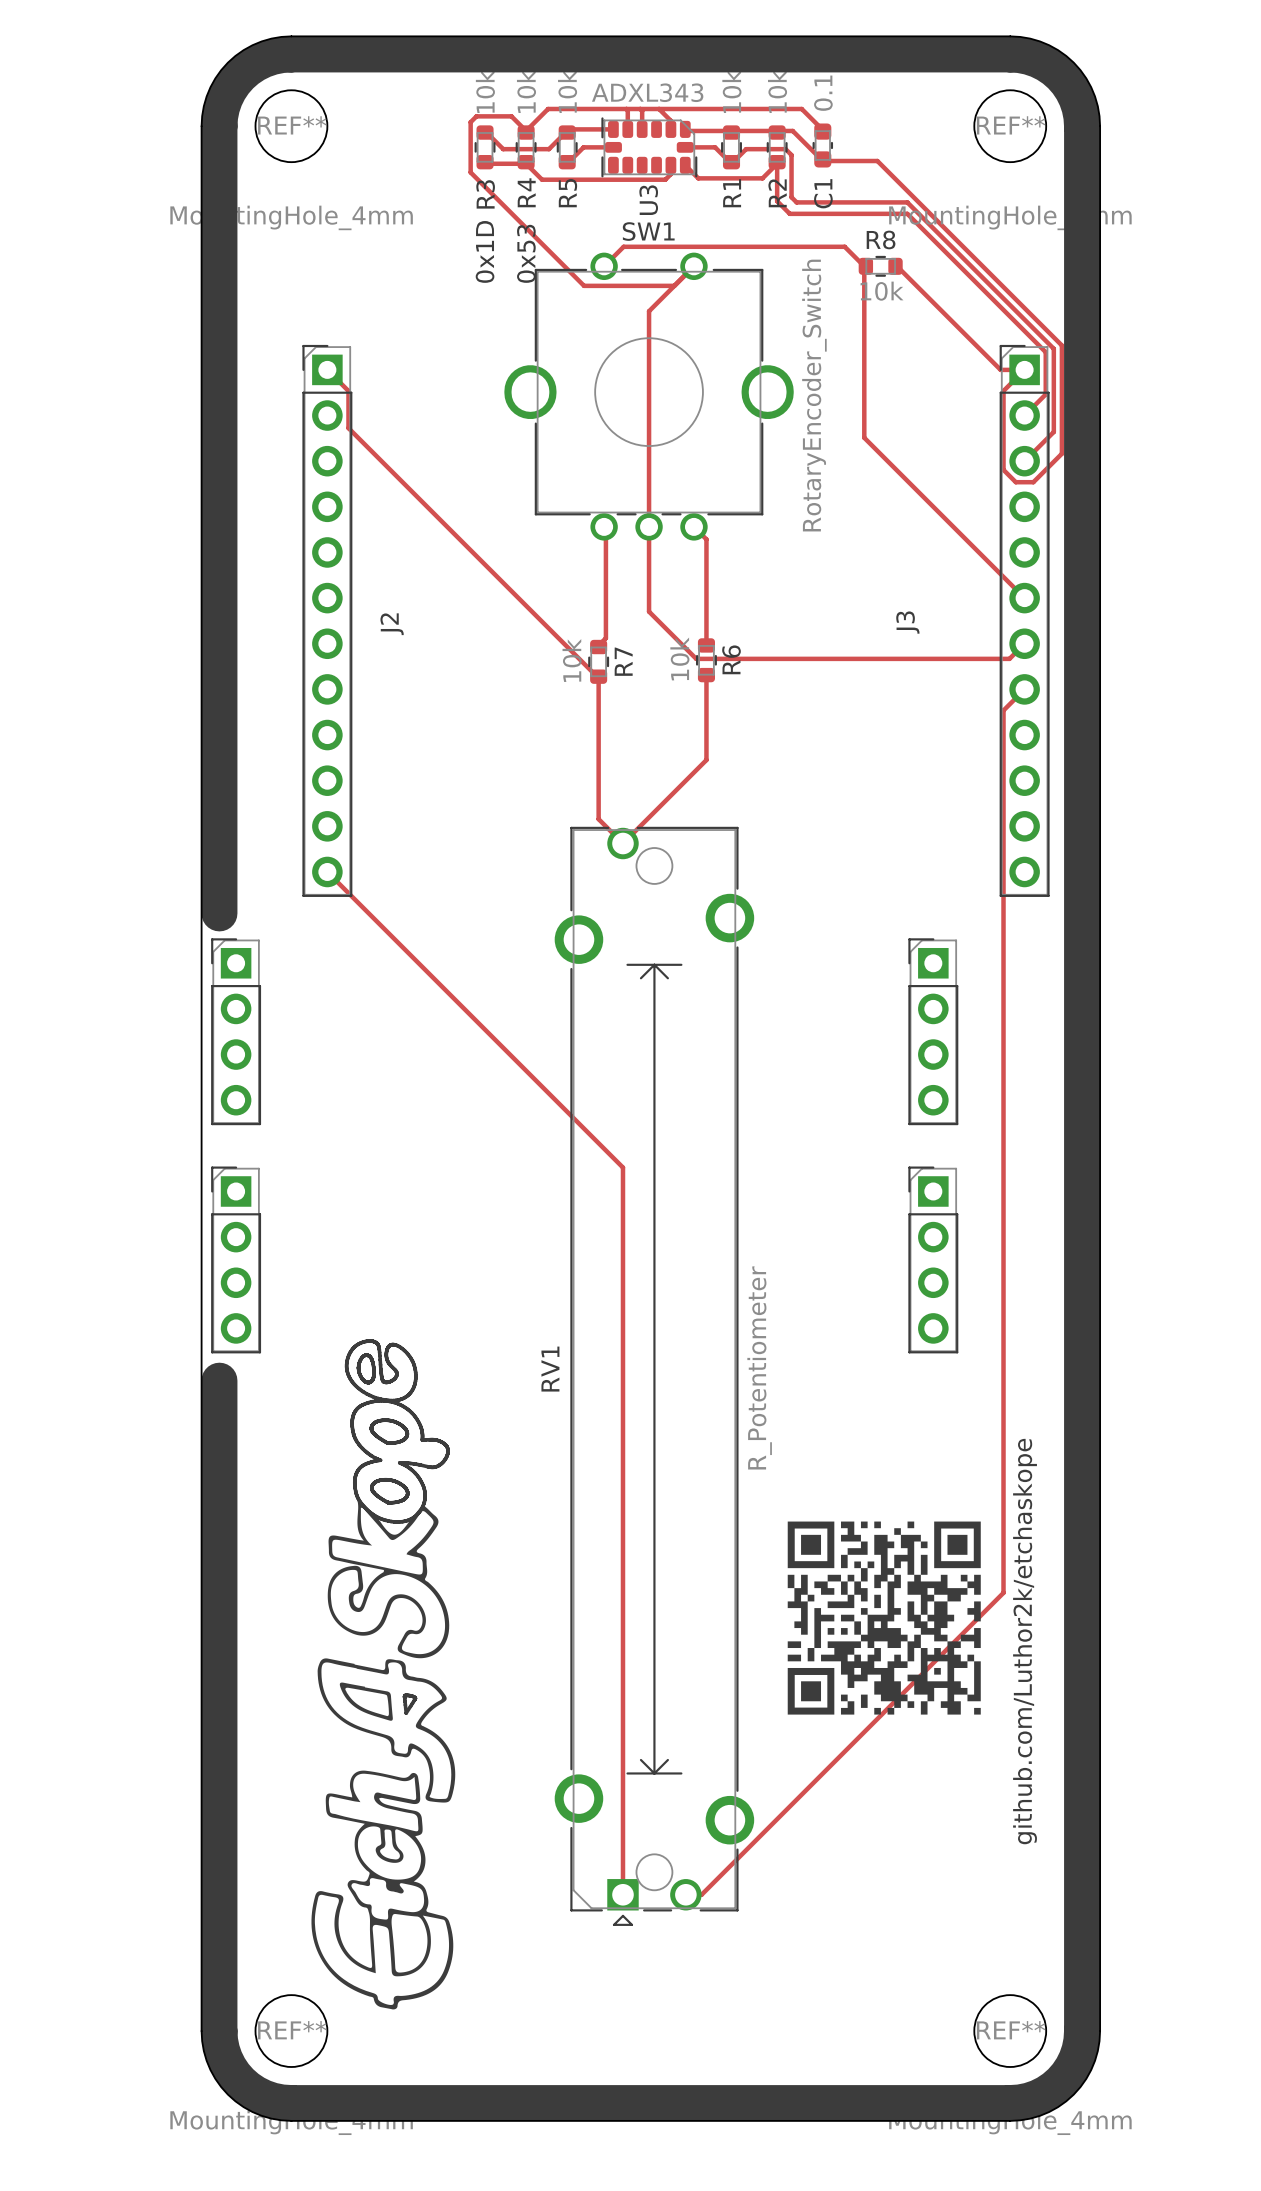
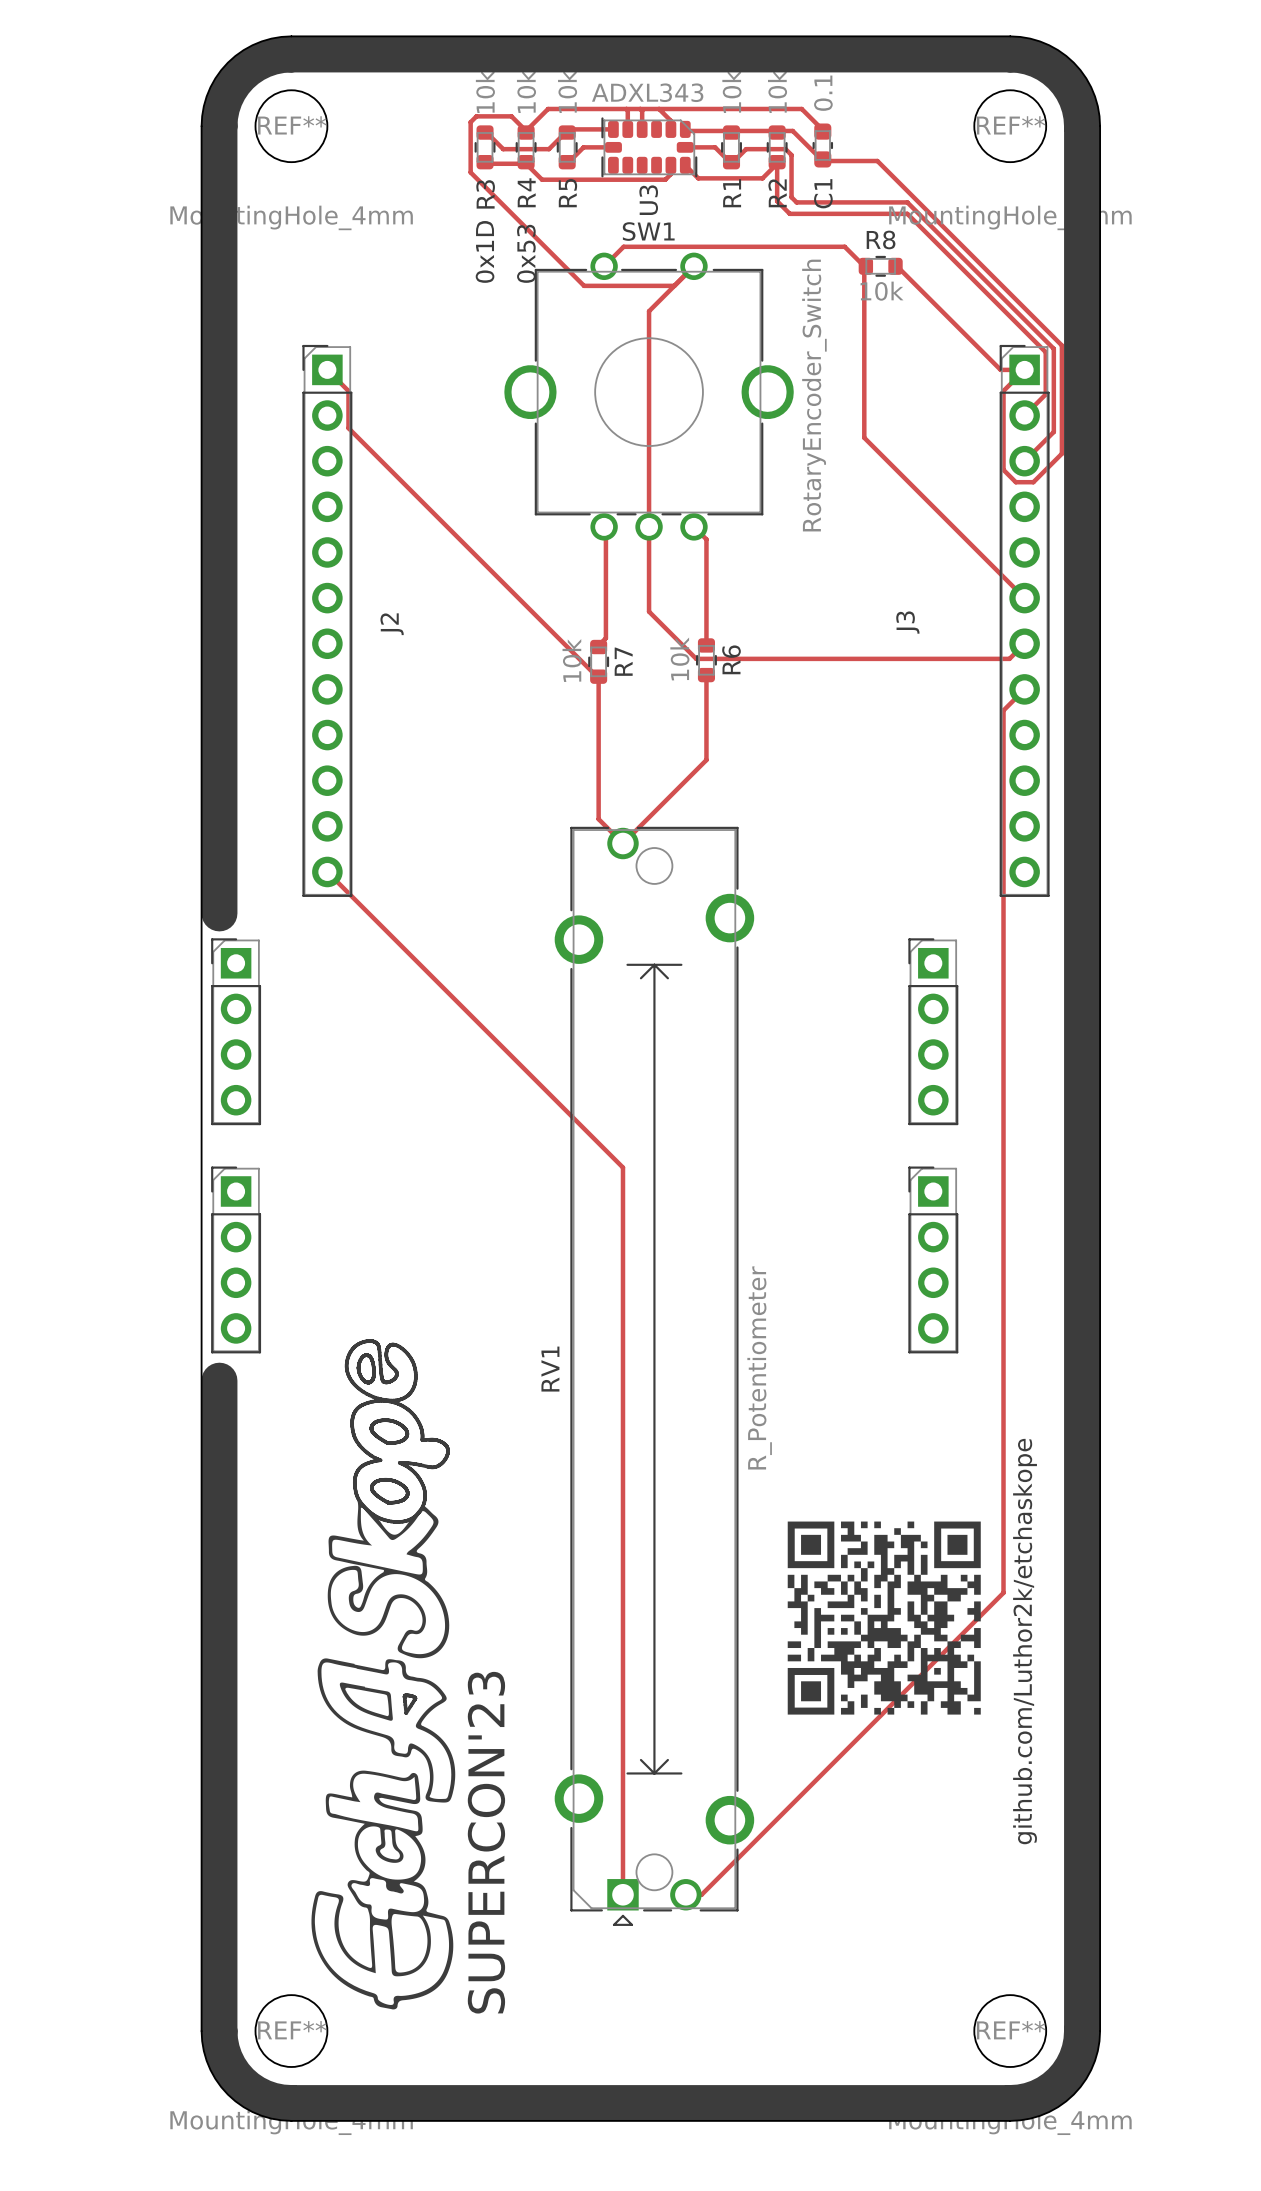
text: none -> SUPERCON'23 (486, 1842)

